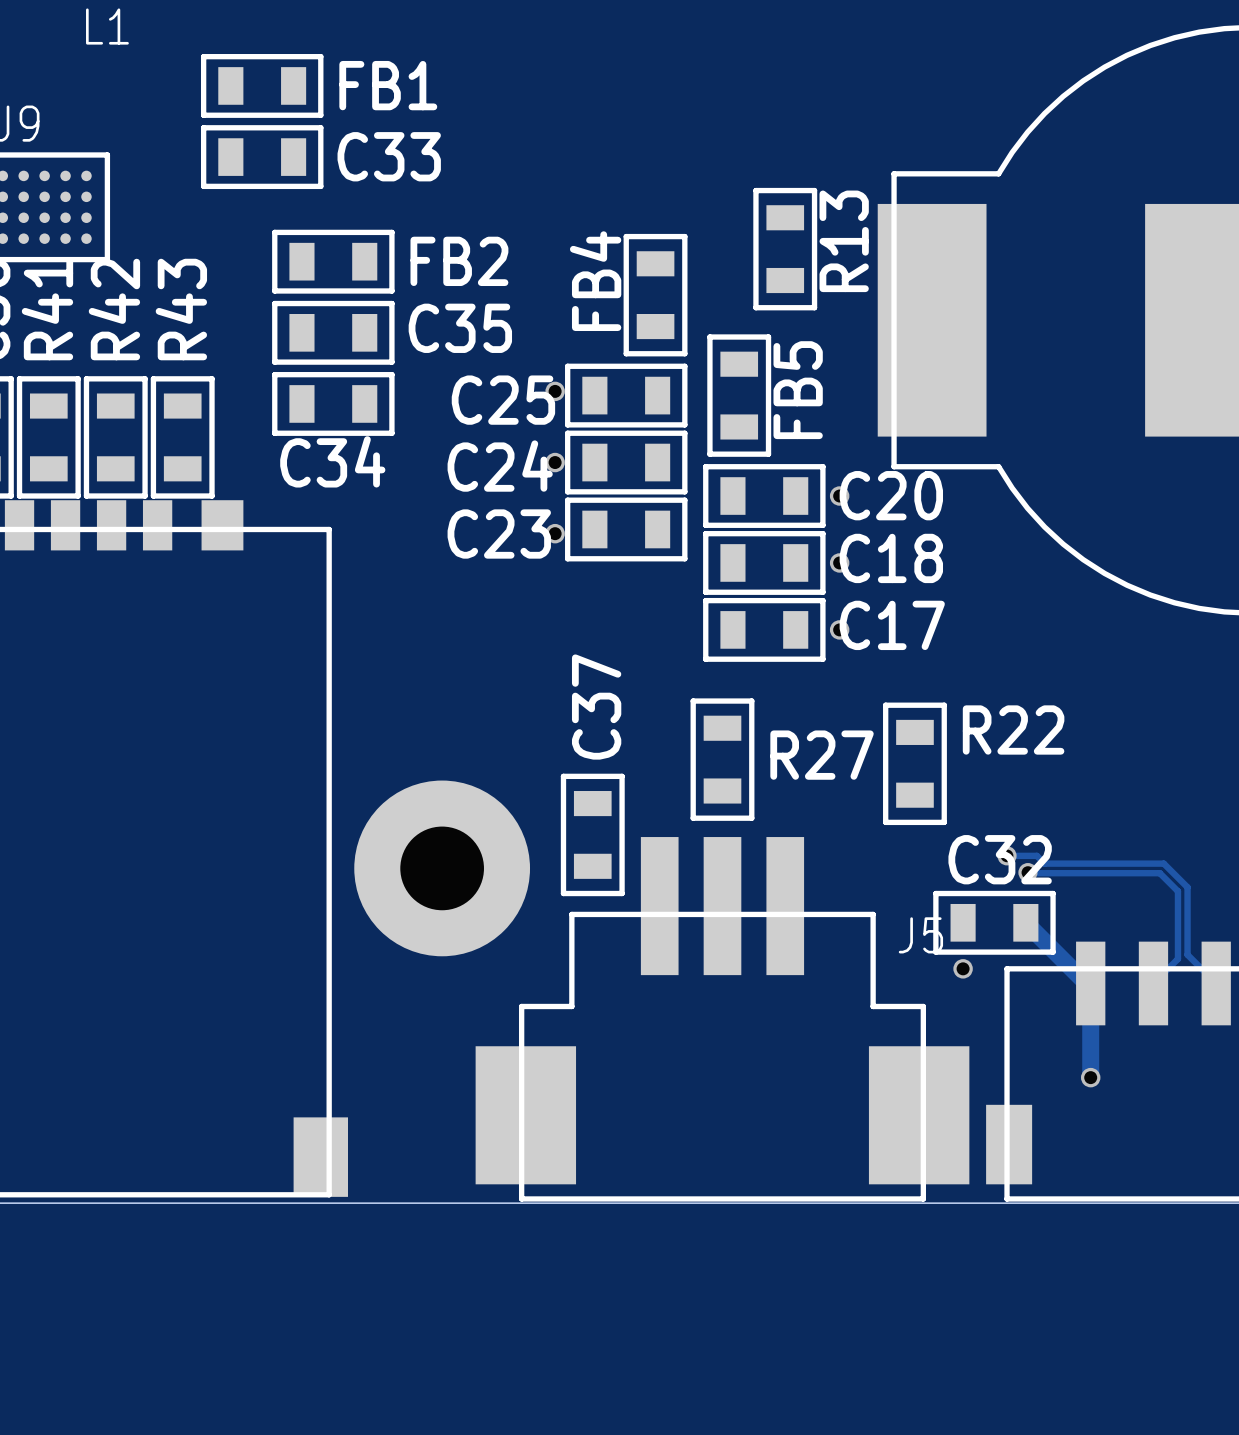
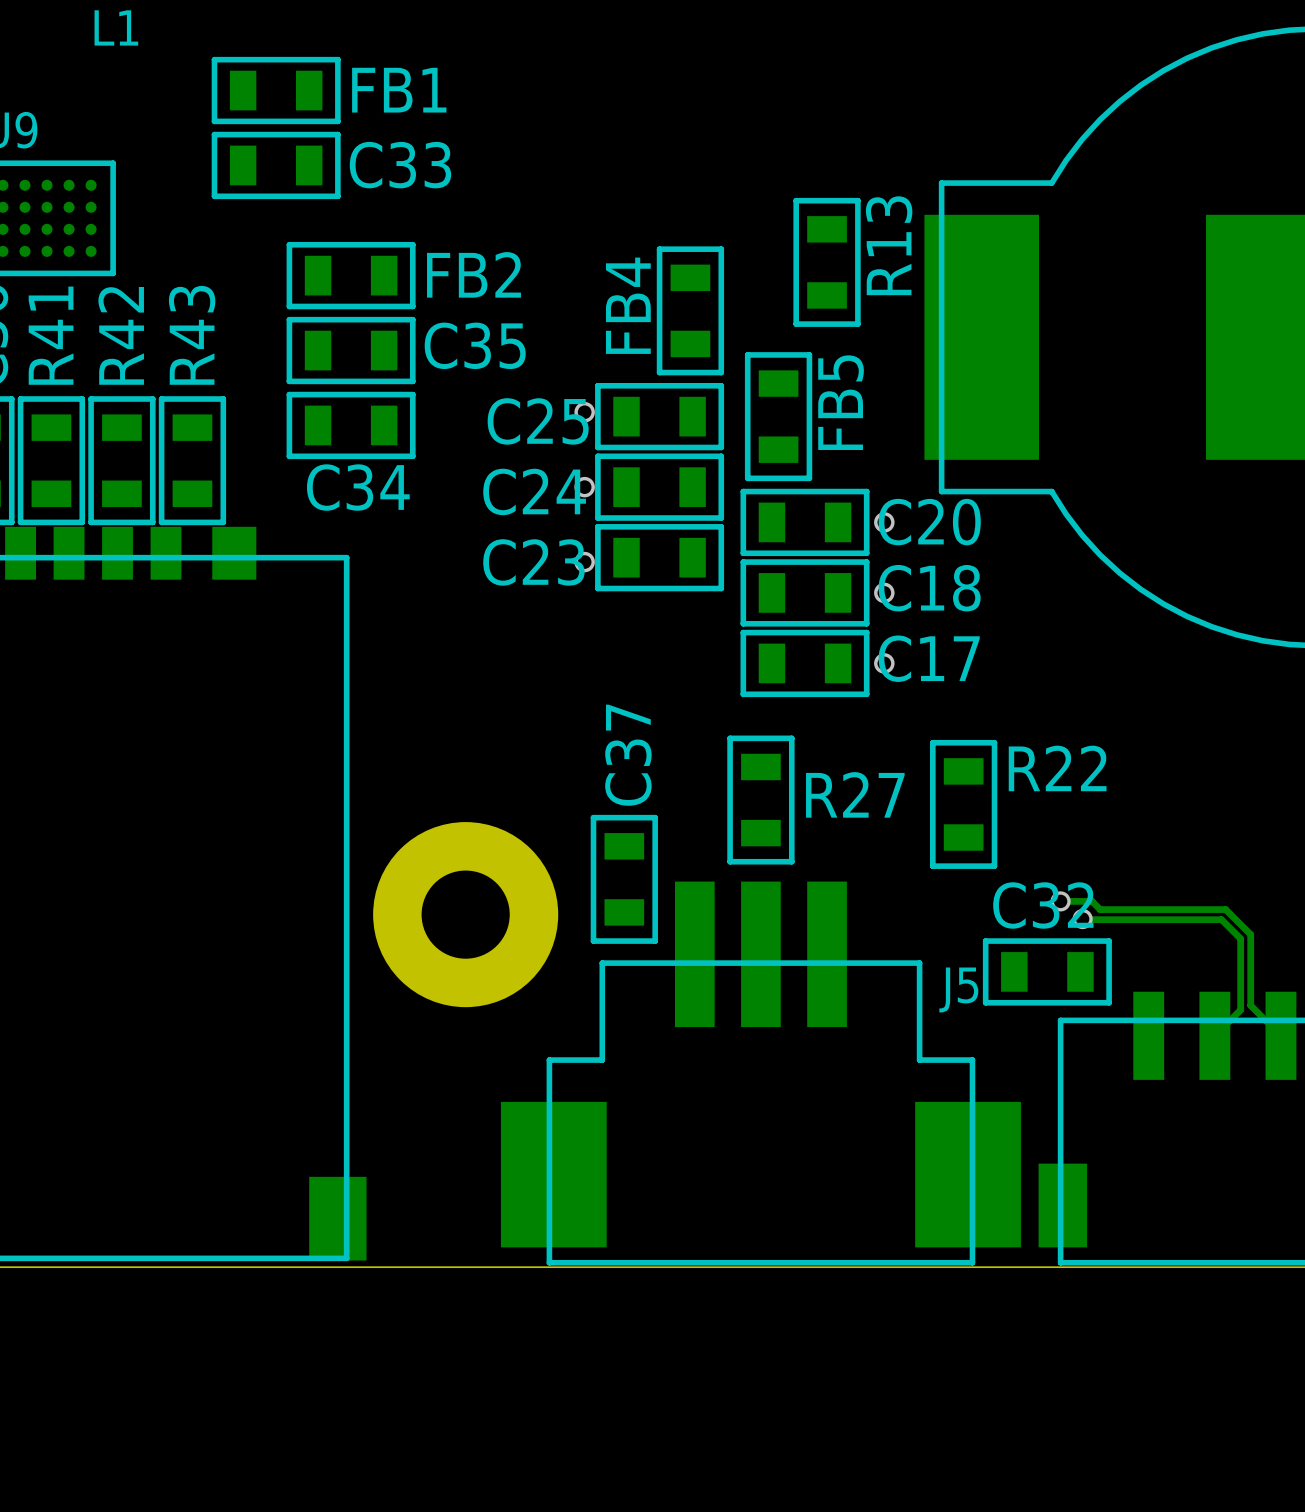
track: (1025, 922) (1086, 983) (1090, 983) (1090, 1077) -> none
via: (963, 968) -> none
via: (1090, 1077) -> none

